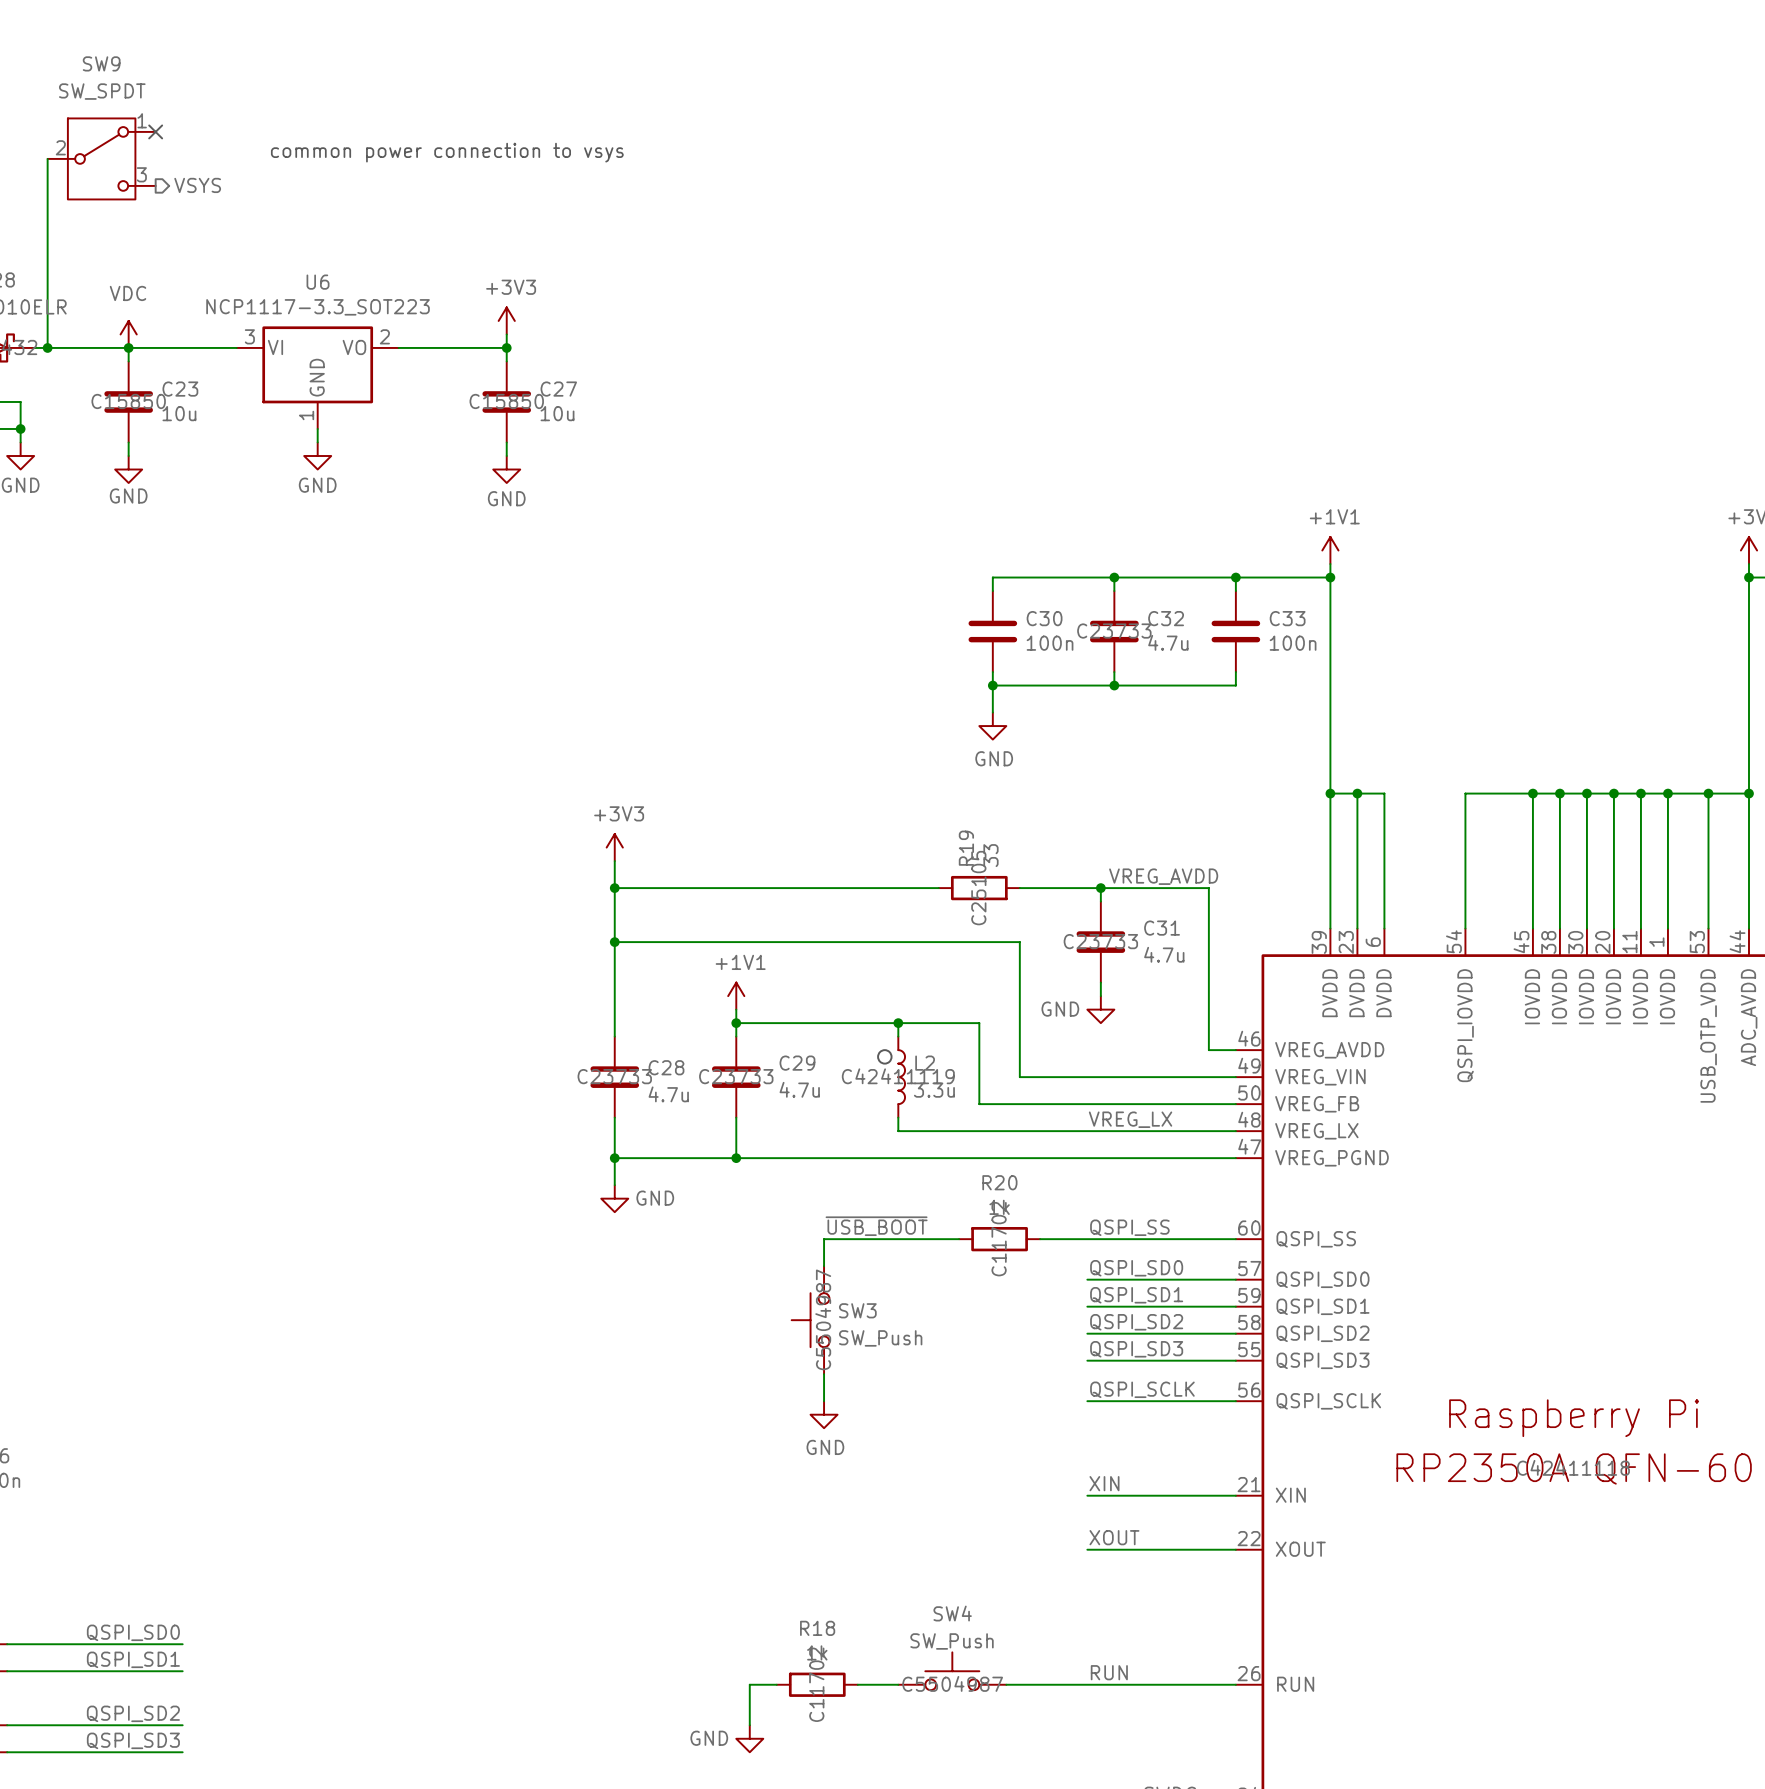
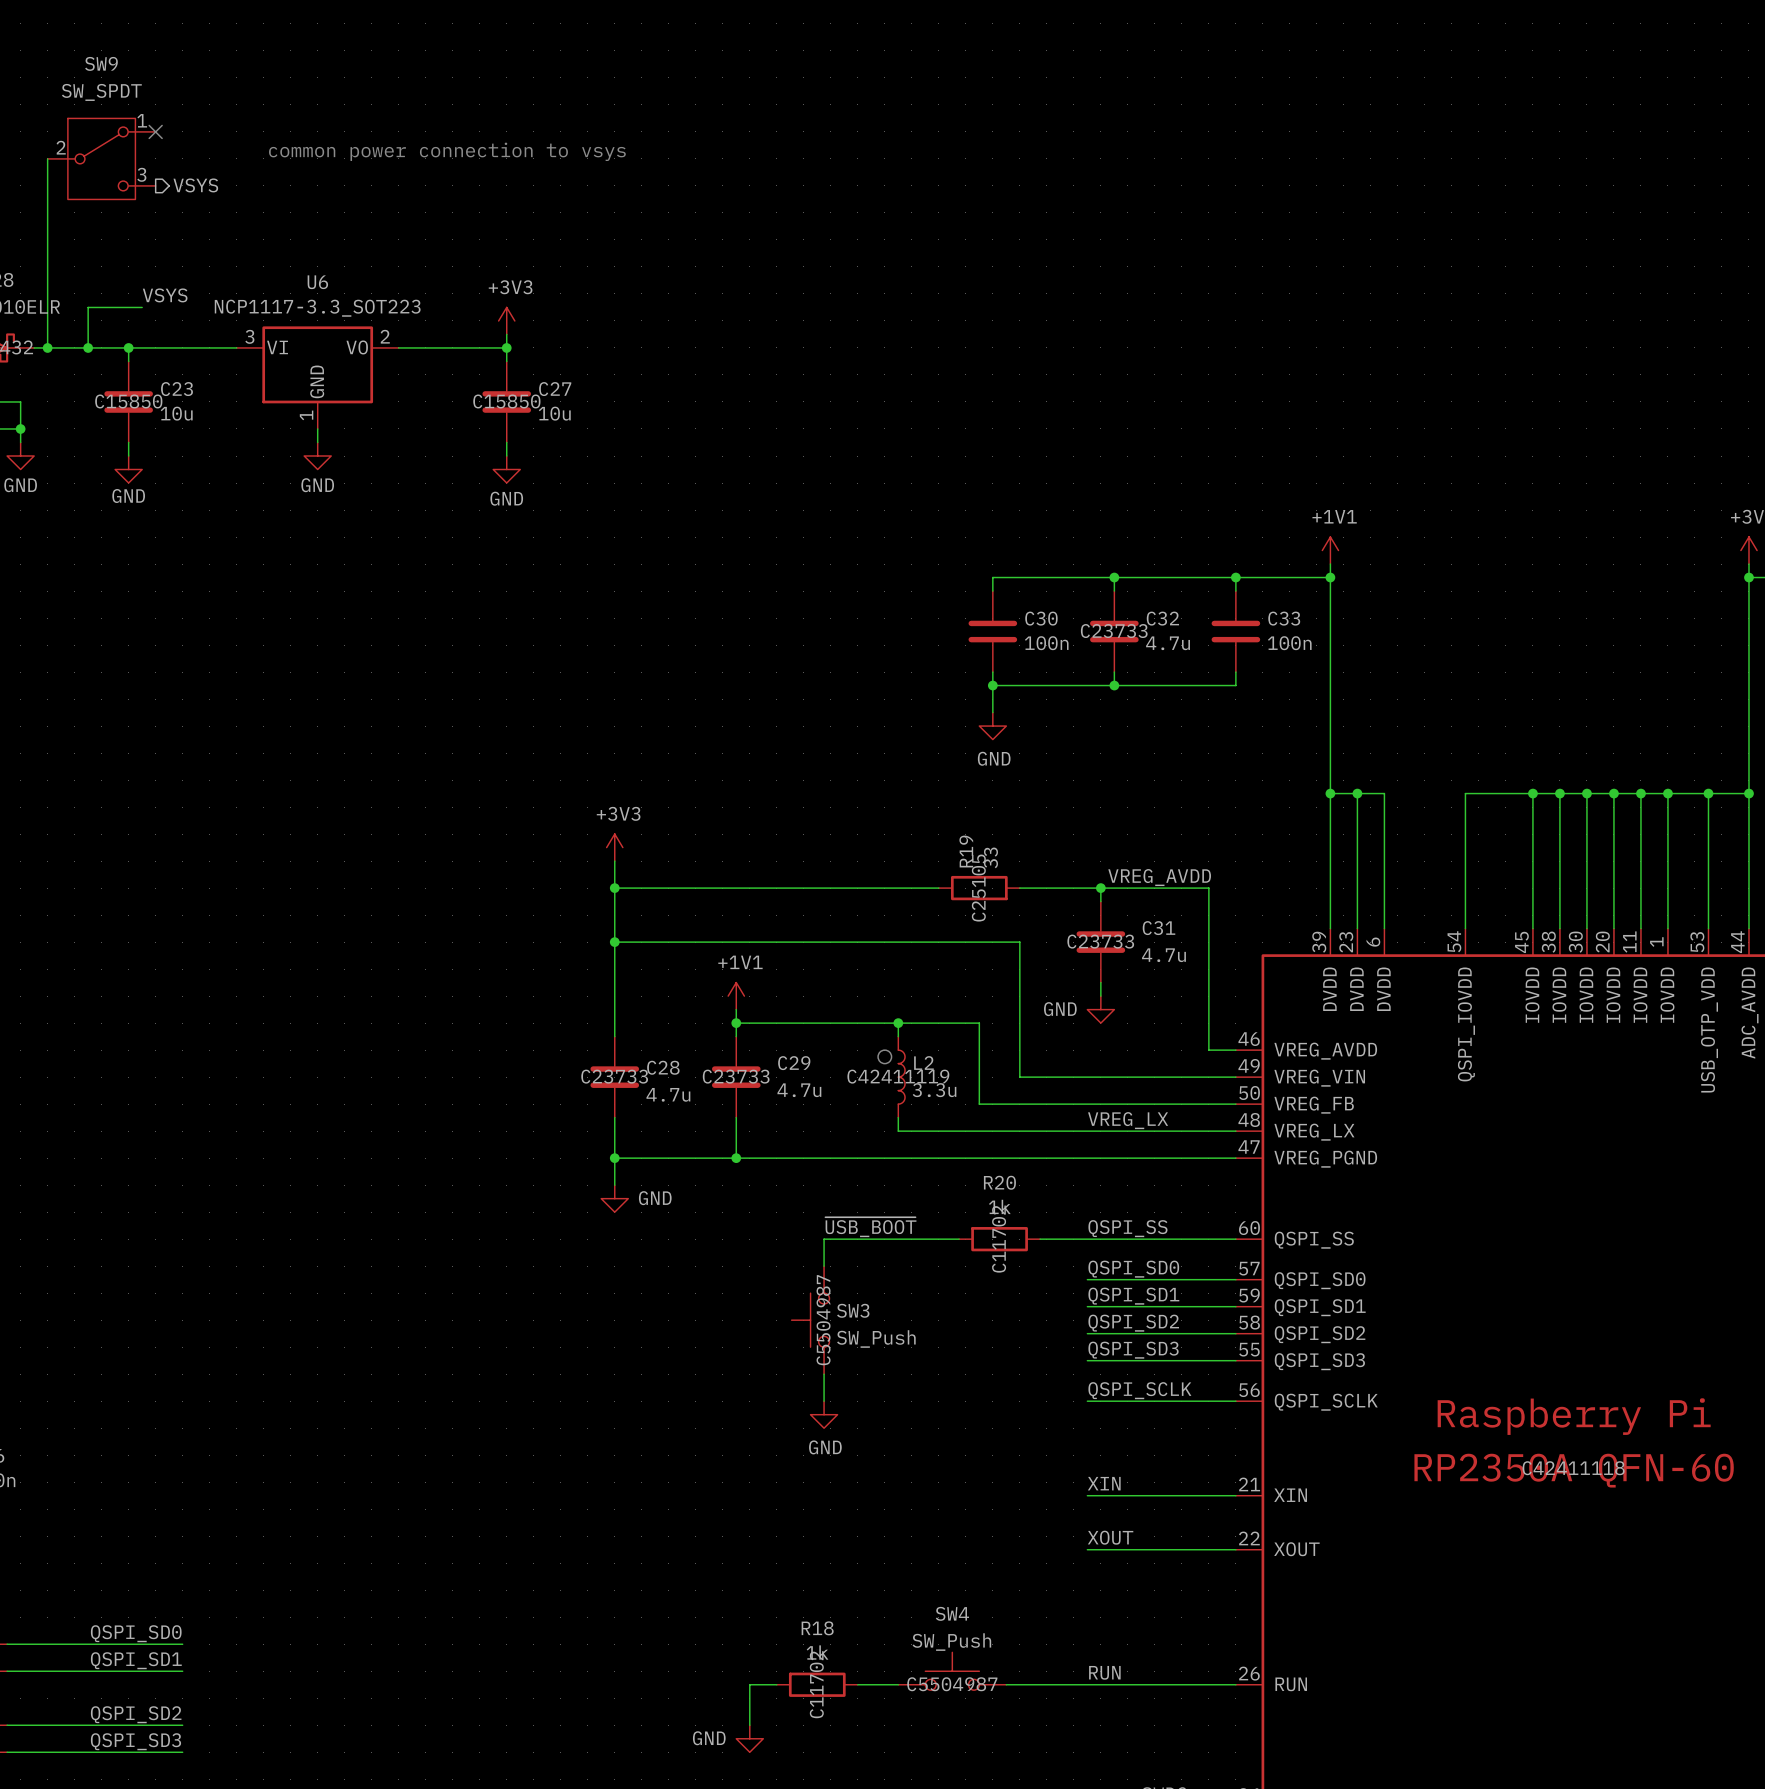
label: none -> VSYS (165, 295)
wire: none -> (142, 307) (88, 307) (88, 347)
power symbol: VDC (128, 334) -> none
junction: none -> (88, 347)

